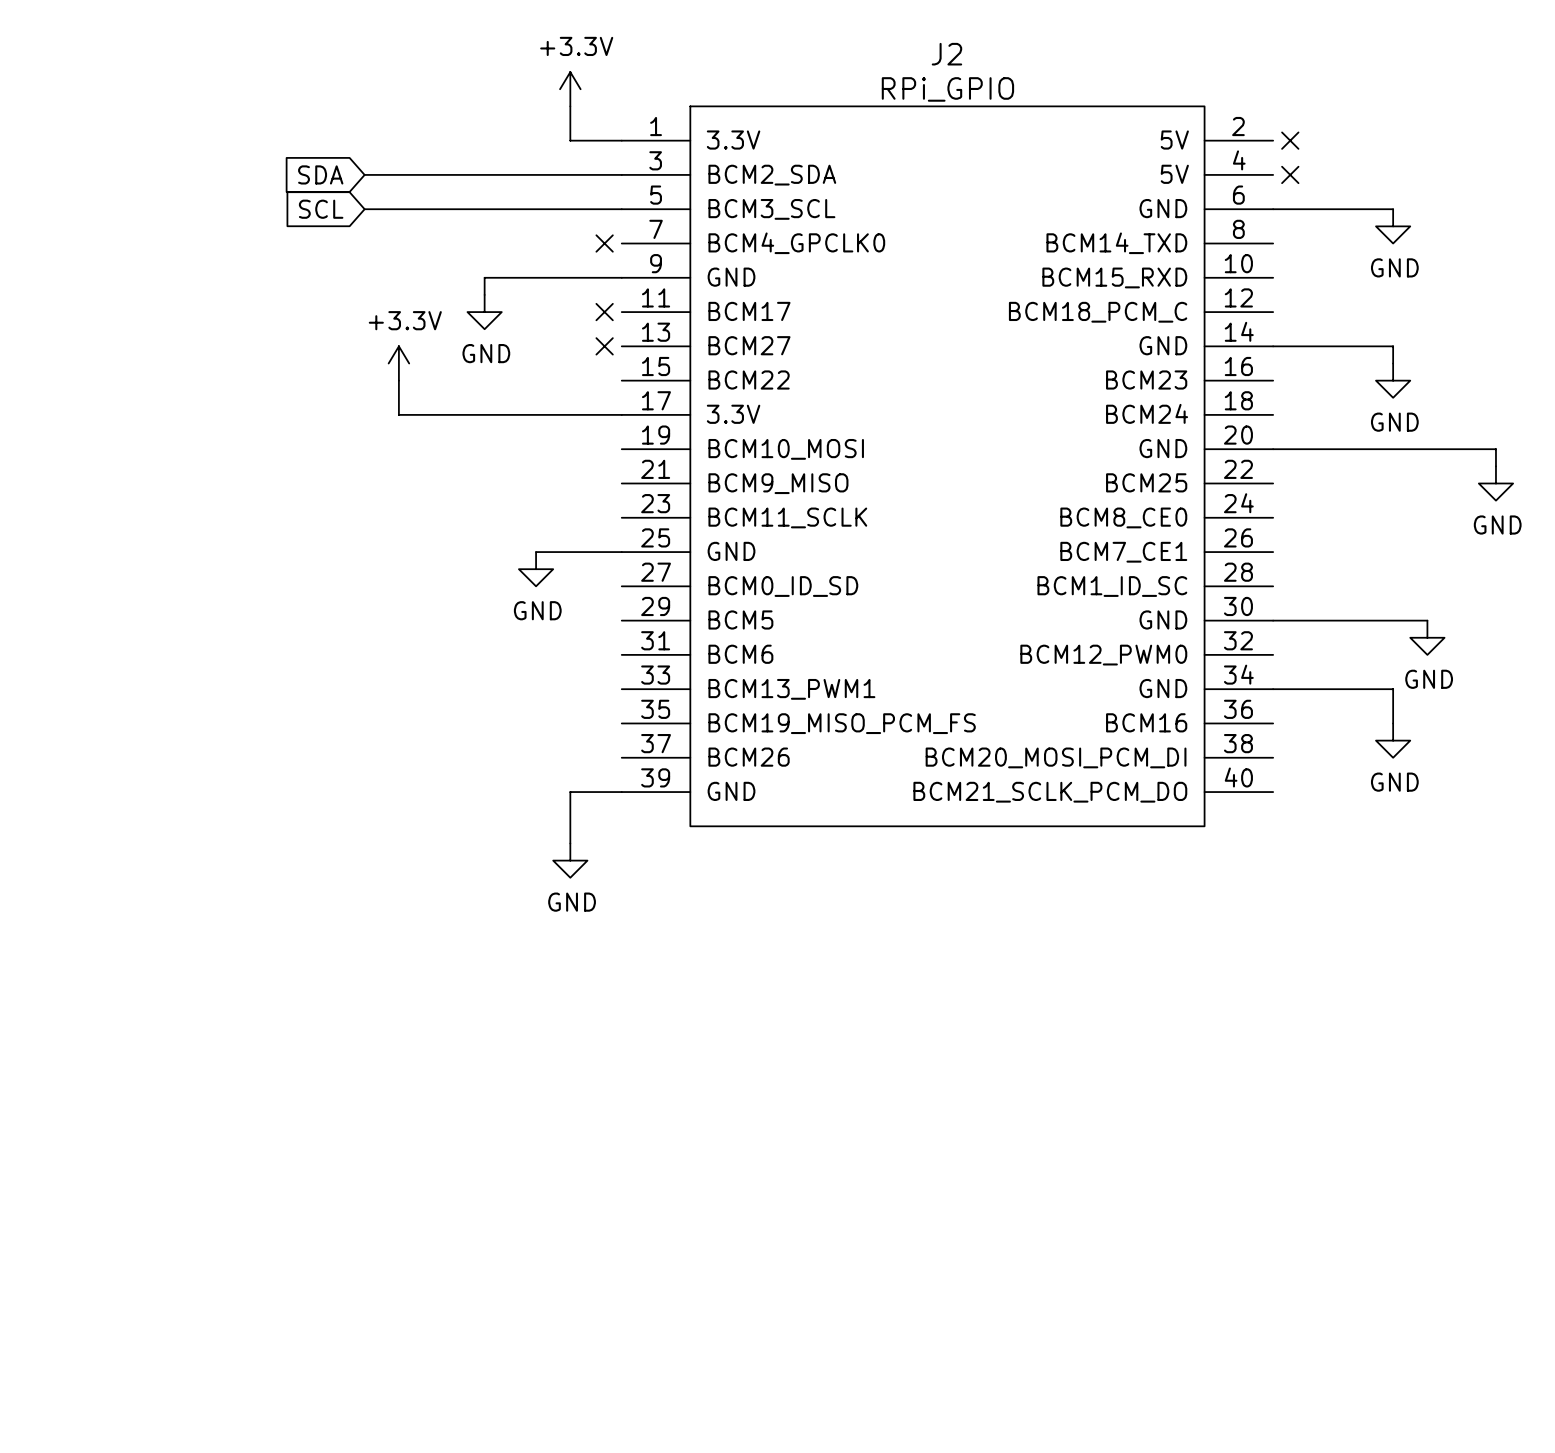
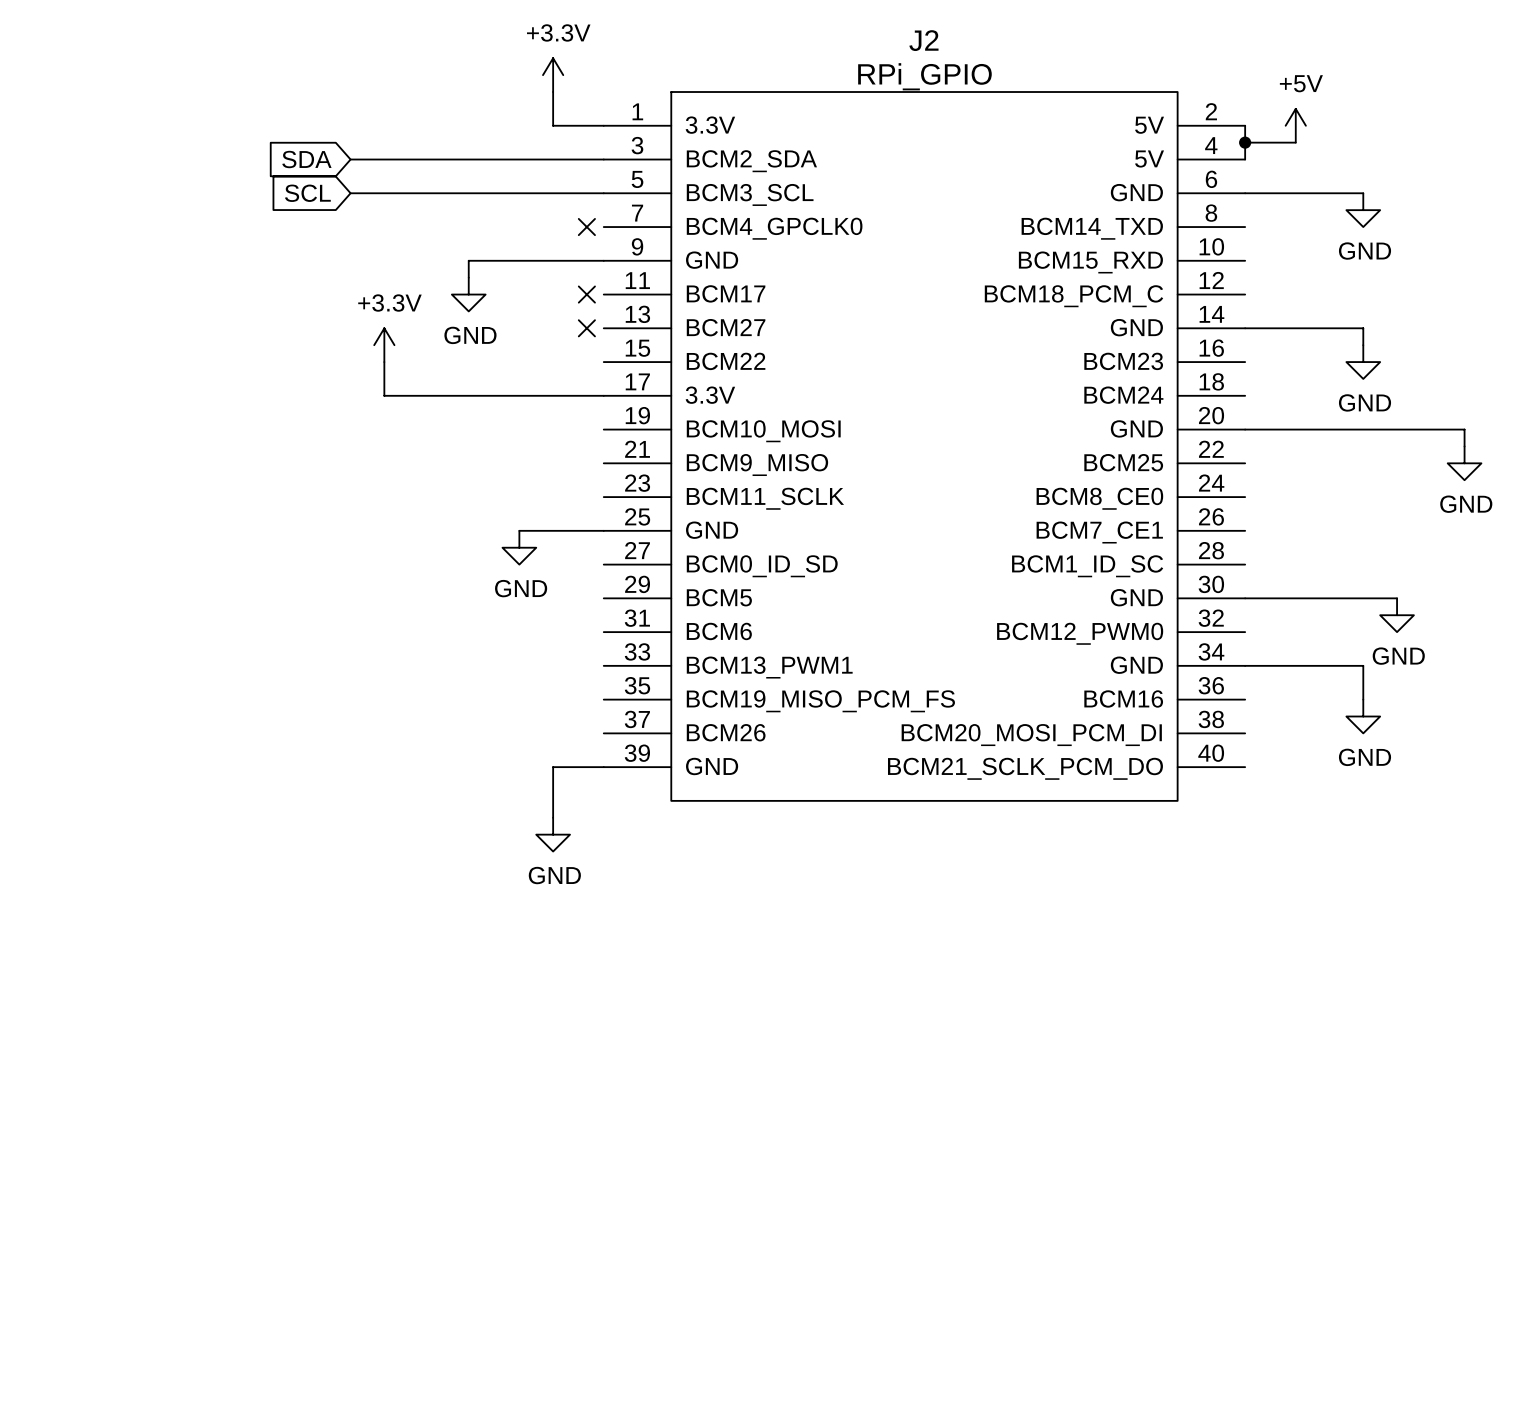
wire: none -> (1245, 125) (1245, 159)
no-connect mark: (1290, 140) -> none
power symbol: none -> +5V (1295, 125)
wire: none -> (1245, 142) (1295, 142)
junction: none -> (1245, 142)
no-connect mark: (1290, 174) -> none

